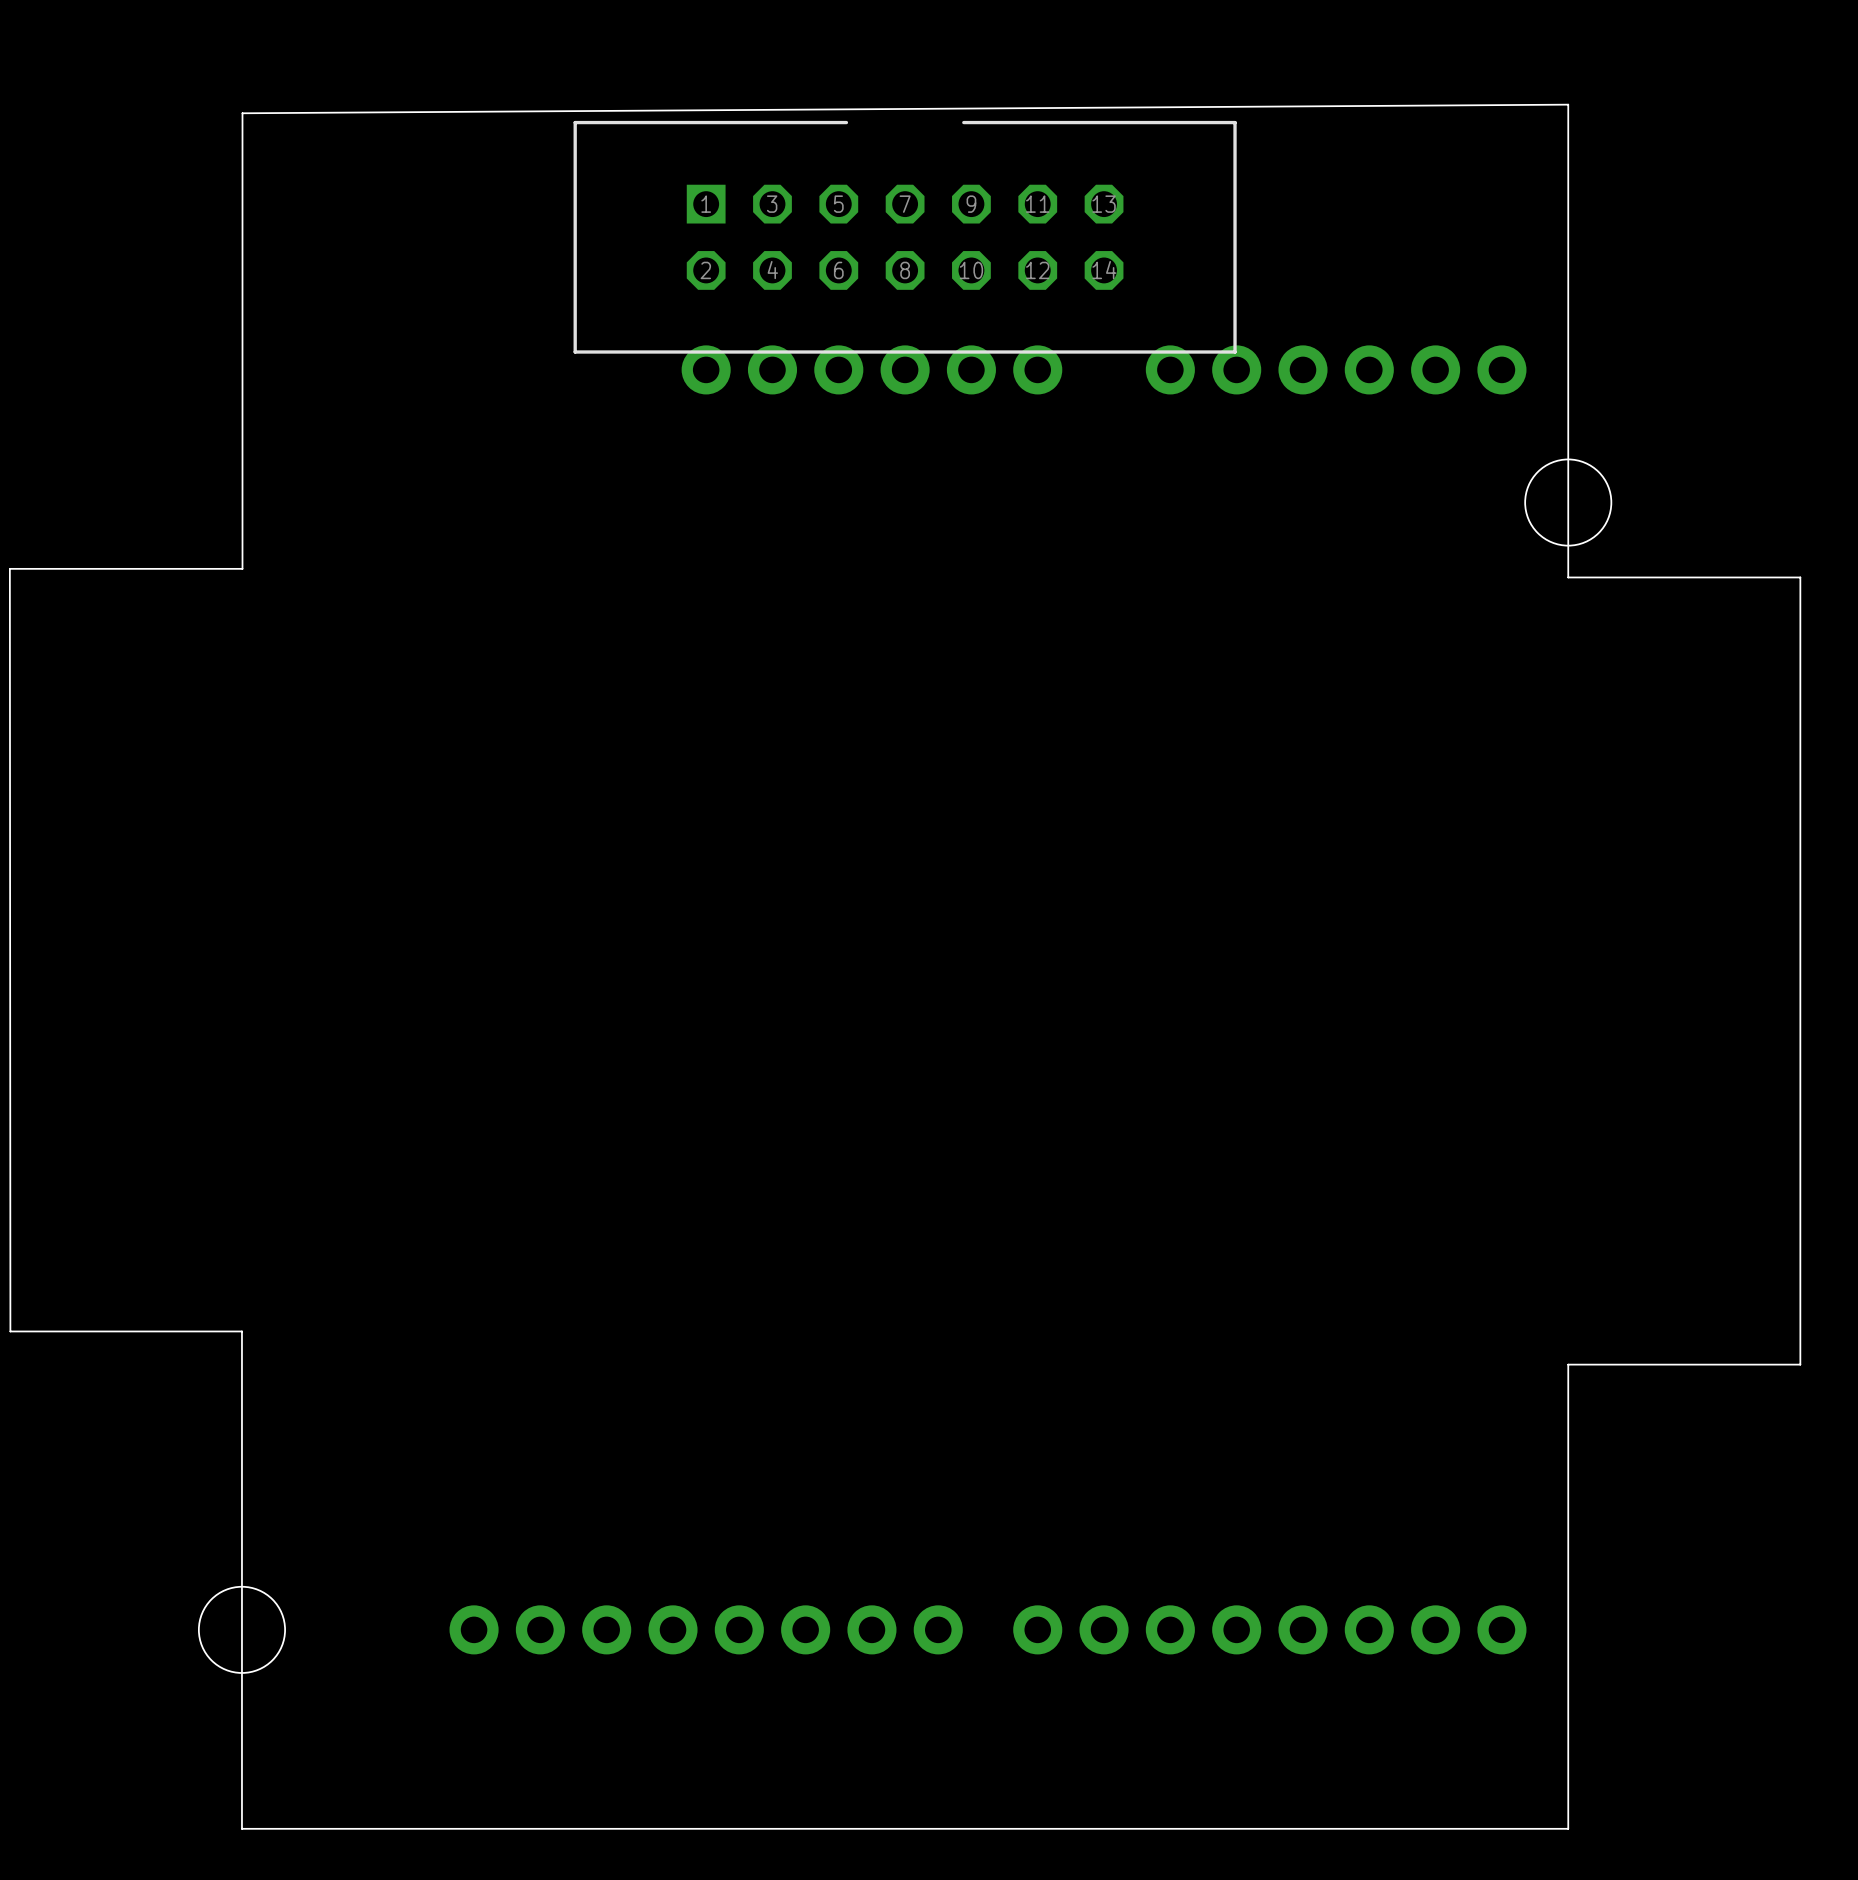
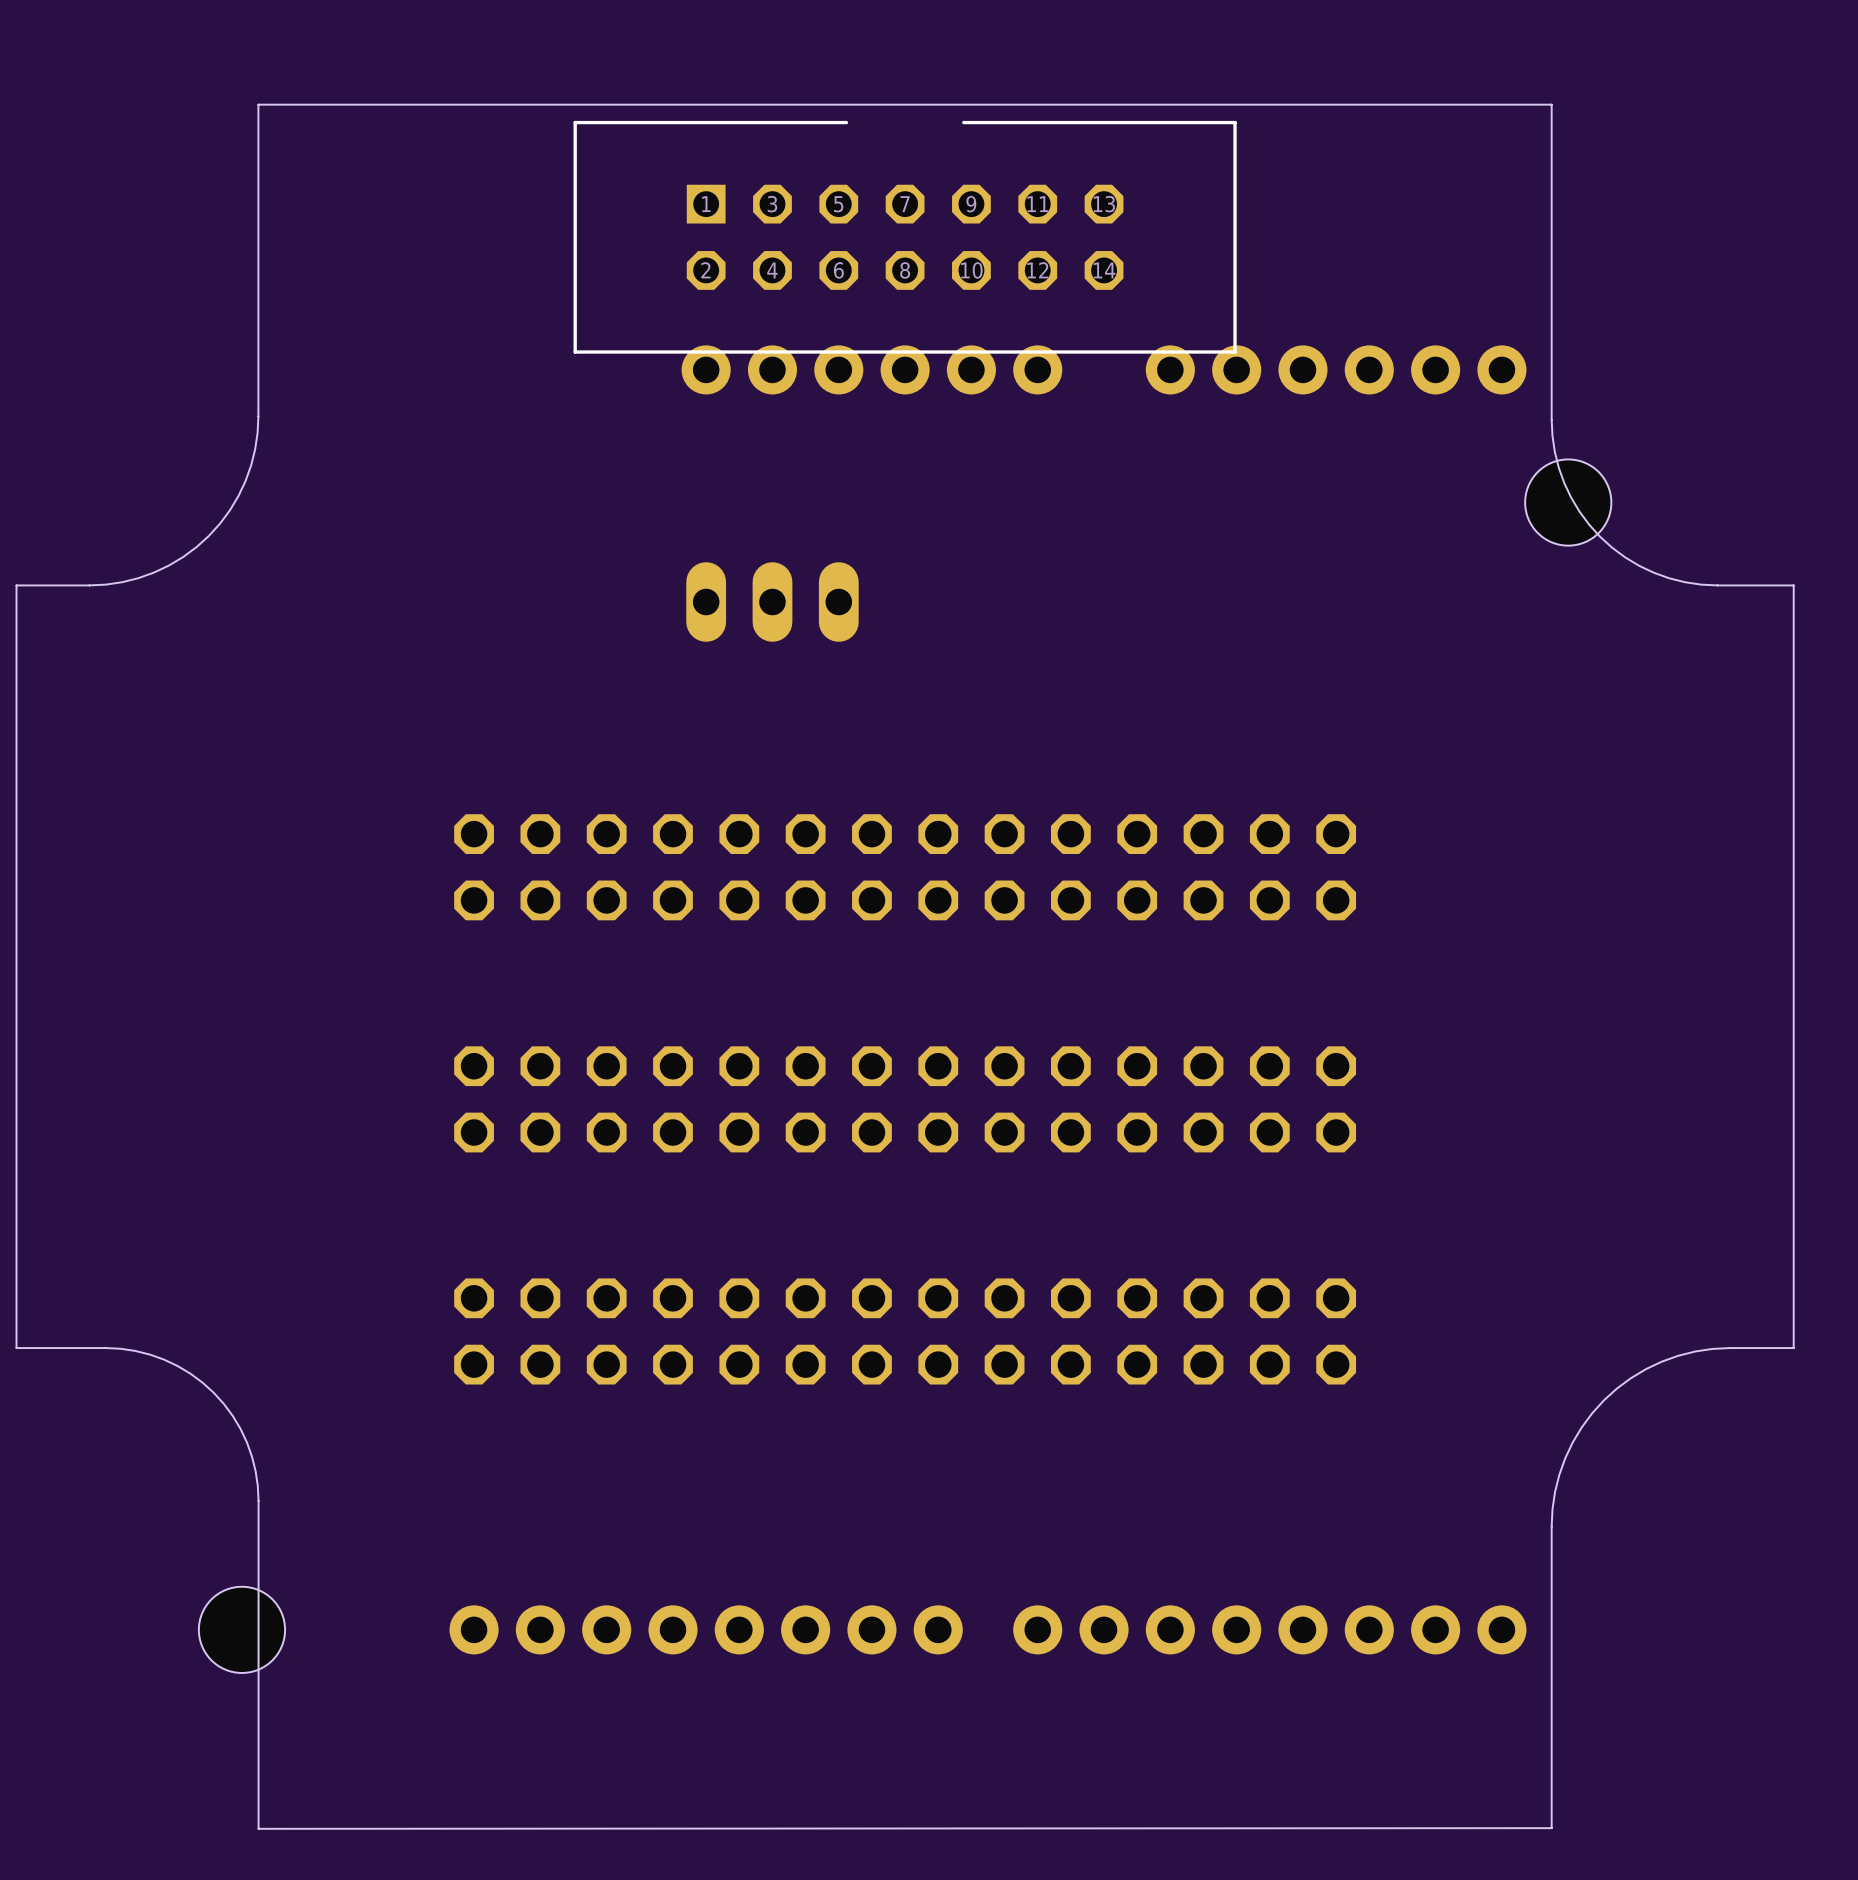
board edge: (1568, 104) (242, 113) (242, 568) (9, 568) (10, 1331) (241, 1331) (241, 1828) (1568, 1828) (1568, 1364) (1800, 1364) (1800, 577) (1568, 577) (1568, 104) -> (1551, 104) (1552, 435) (1558, 467) (1571, 497) (1589, 524) (1612, 547) (1639, 565) (1654, 572) (1669, 578) (1701, 584) (1793, 585) (1793, 1348) (1712, 1348) (1695, 1351) (1661, 1361) (1631, 1378) (1603, 1400) (1581, 1427) (1572, 1442) (1559, 1474) (1552, 1509) (1551, 1828) (258, 1828) (258, 1500) (251, 1456) (240, 1428) (213, 1392) (190, 1373) (164, 1359) (120, 1348) (16, 1348) (16, 585) (105, 584) (122, 582) (154, 572) (169, 565) (196, 547) (220, 523) (238, 496) (251, 465) (257, 432) (258, 104) (1551, 104)
part: none -> (772, 602)
part: none -> (905, 867)
part: none -> (905, 1099)
part: none -> (905, 1331)

